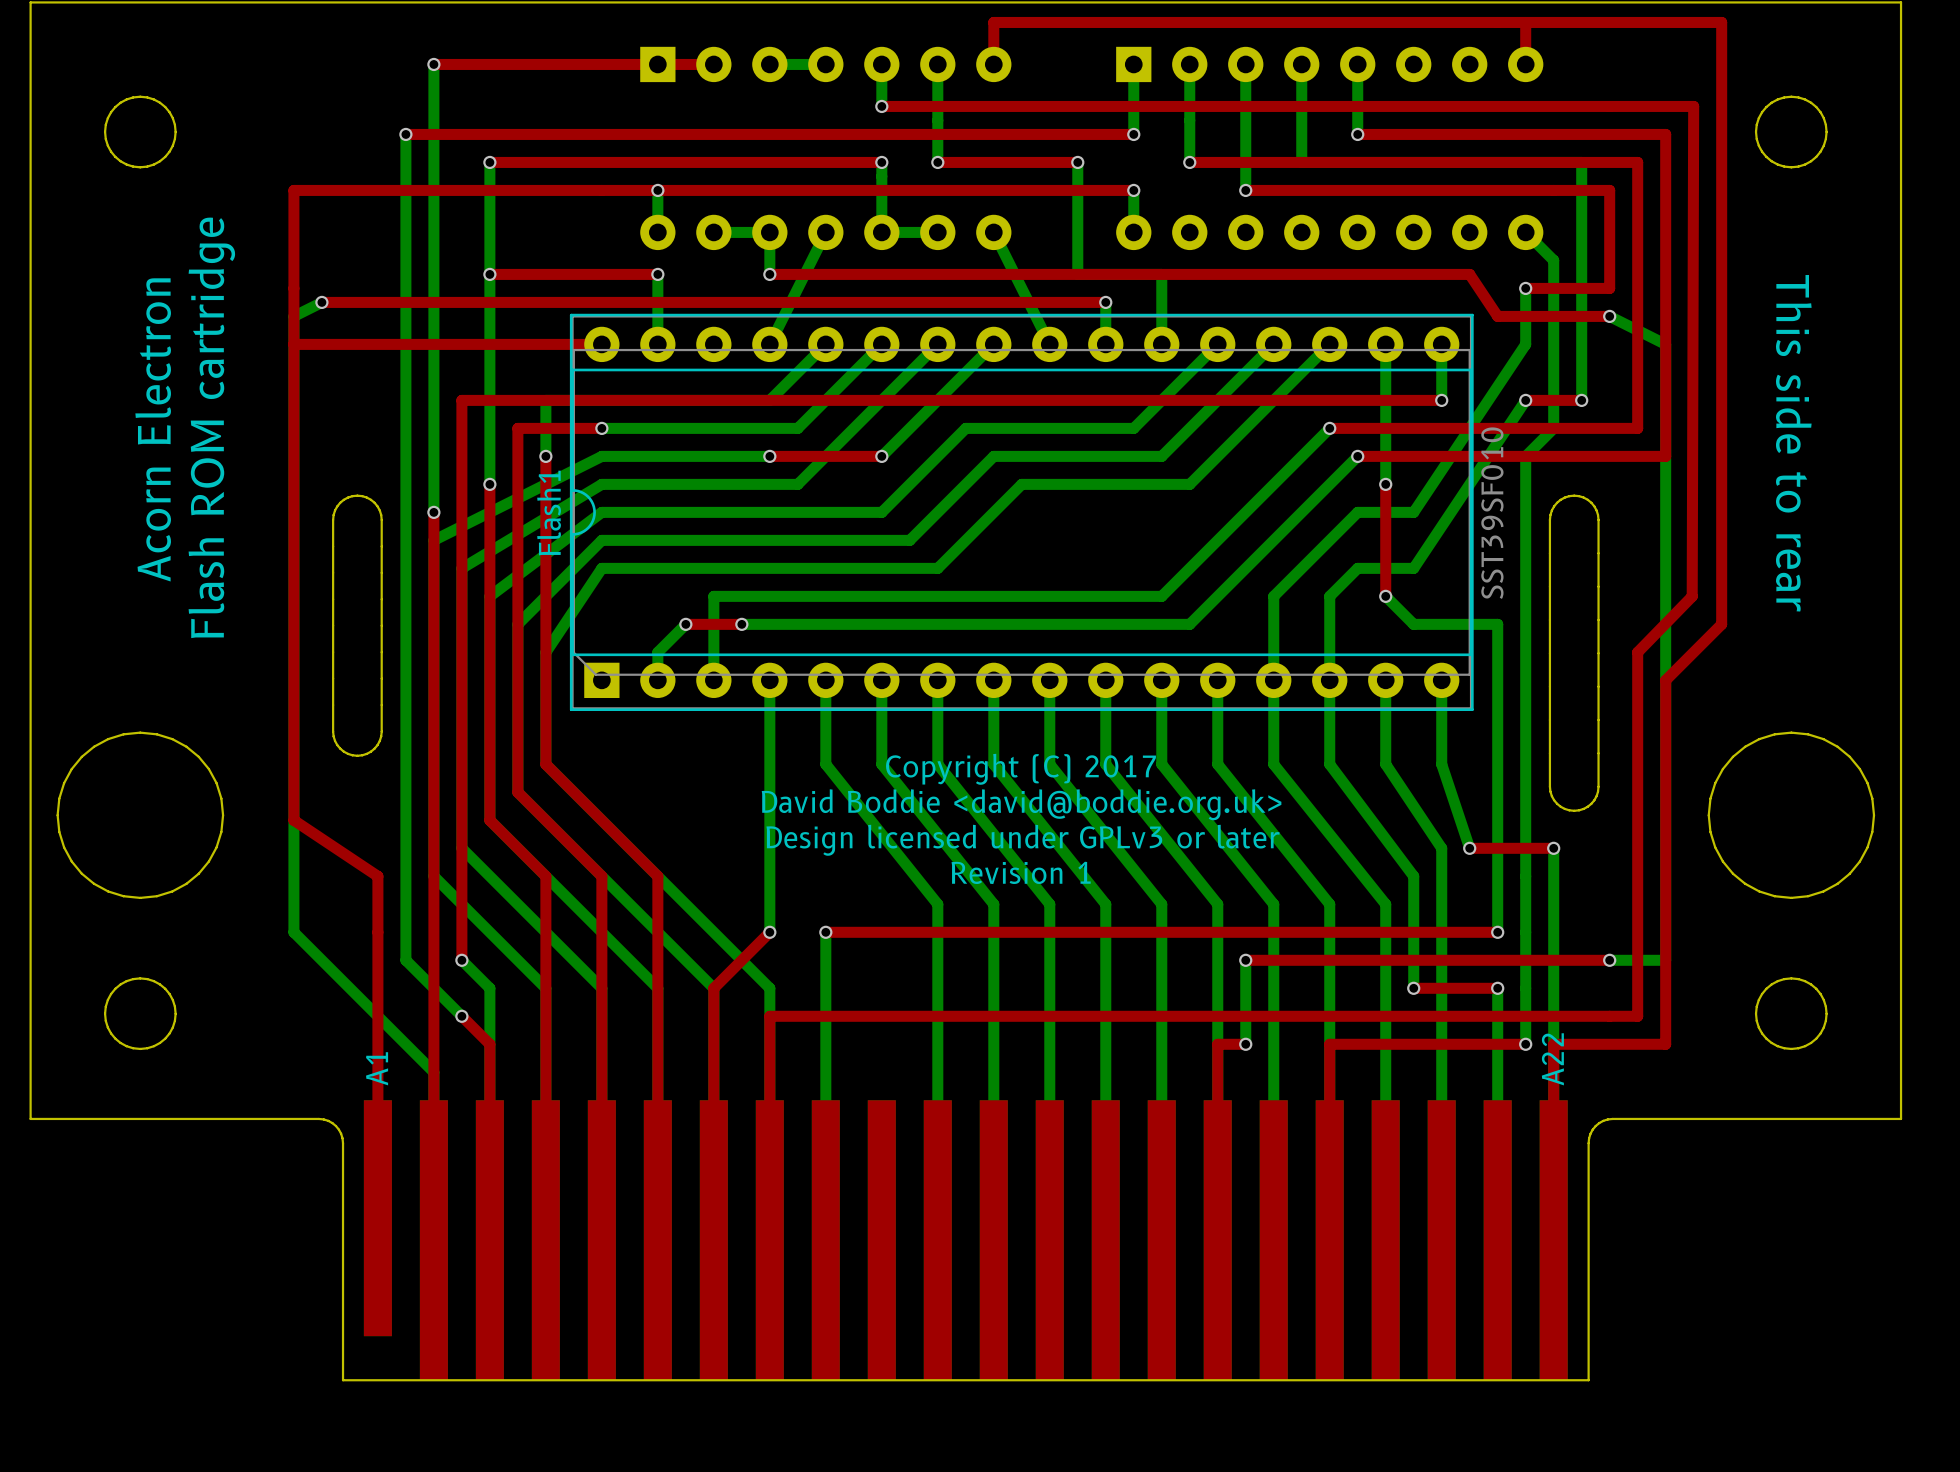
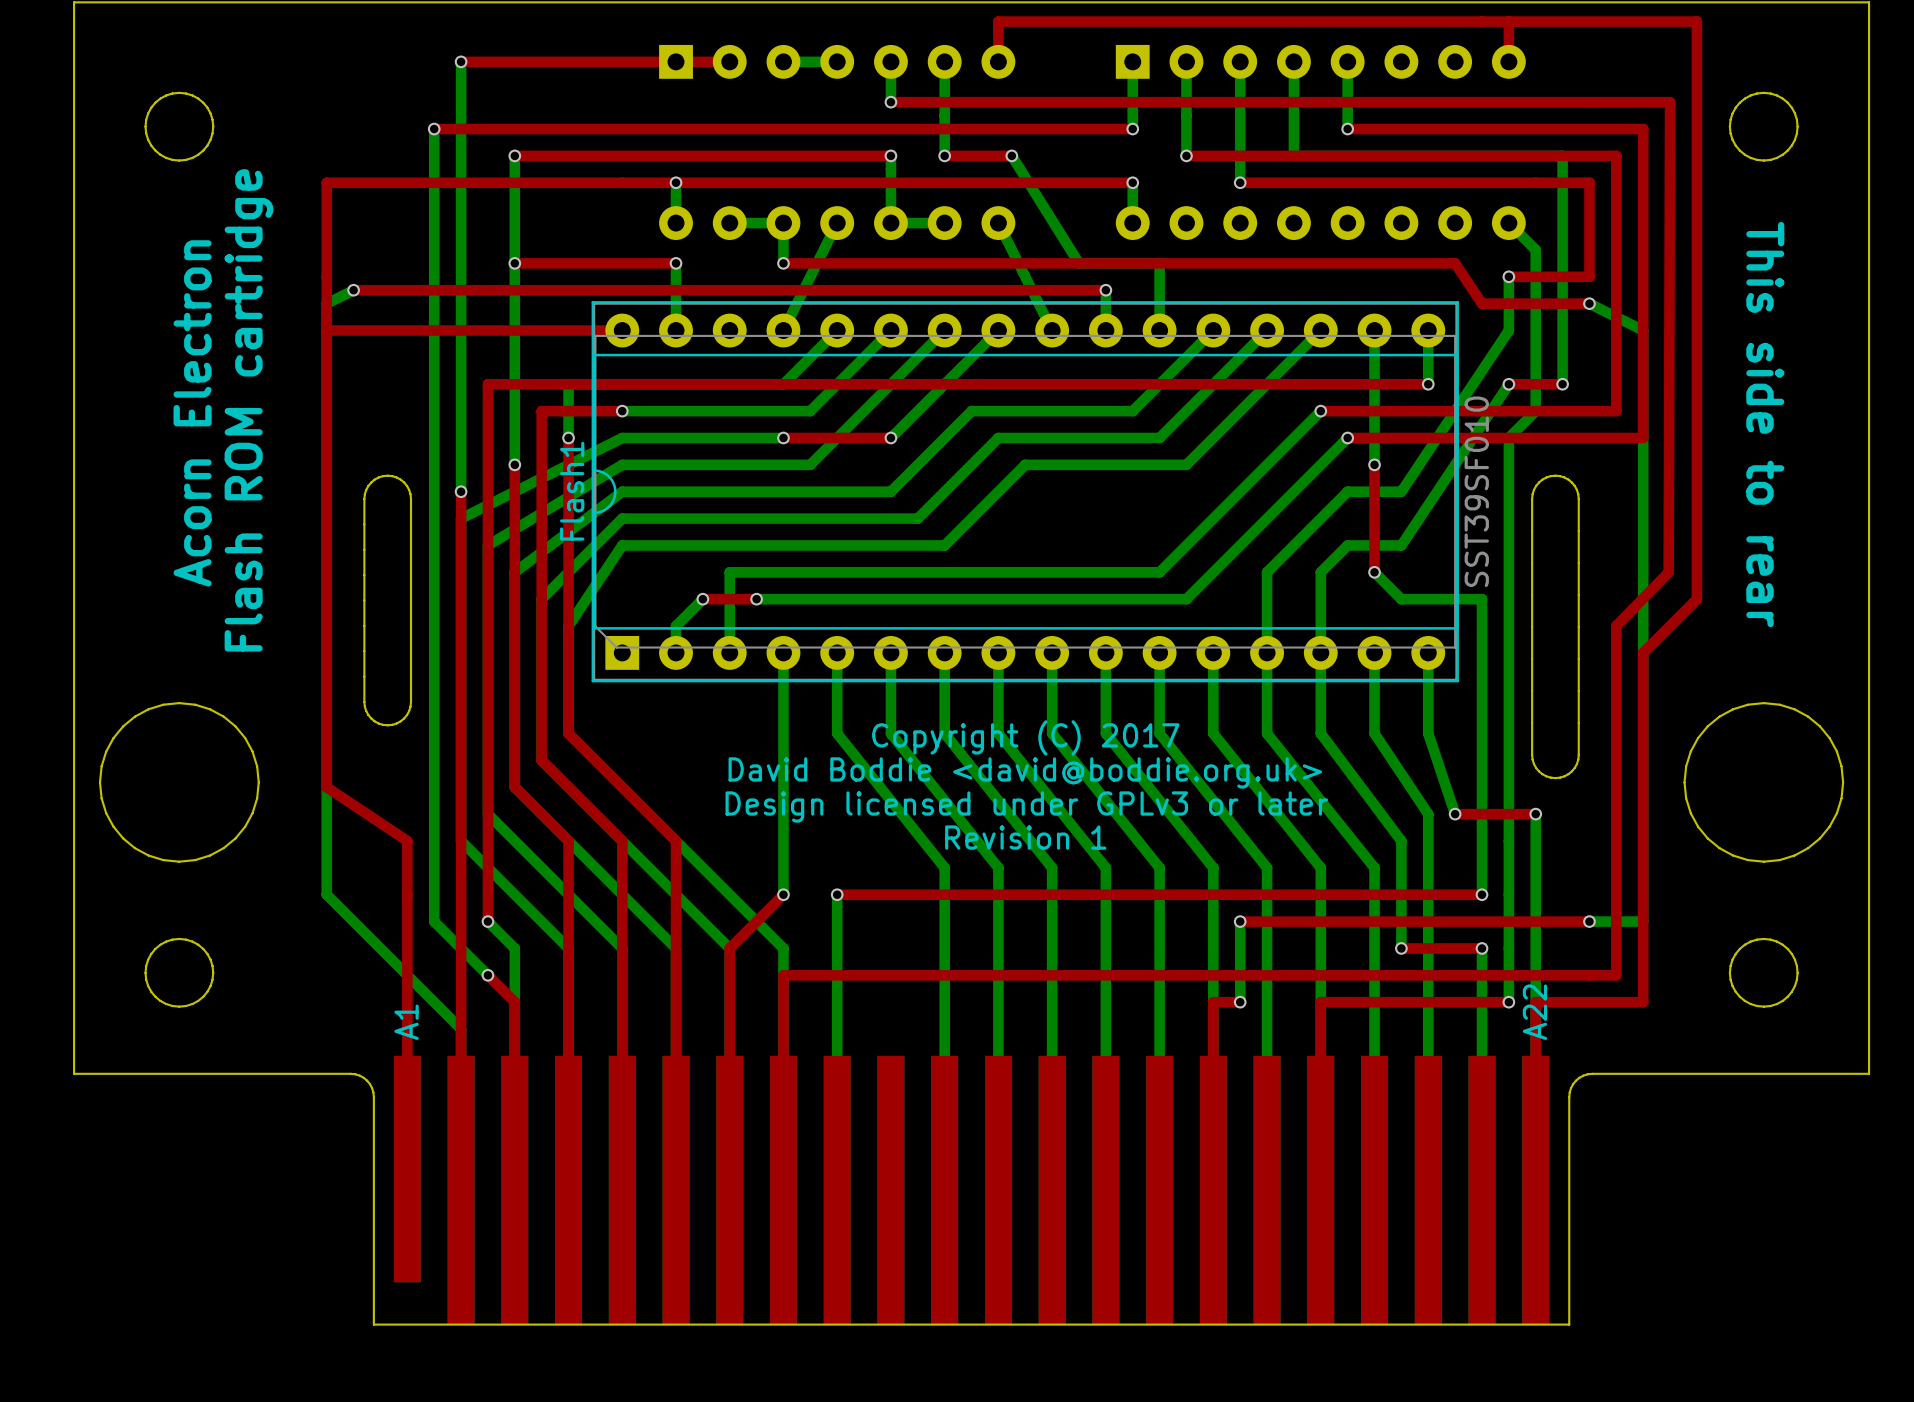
top track: (1007, 162) (1077, 162) -> none
bottom track: (1077, 162) (1077, 274) -> (1011, 155) (1079, 263)
via position: (1077, 162) -> (1011, 155)

